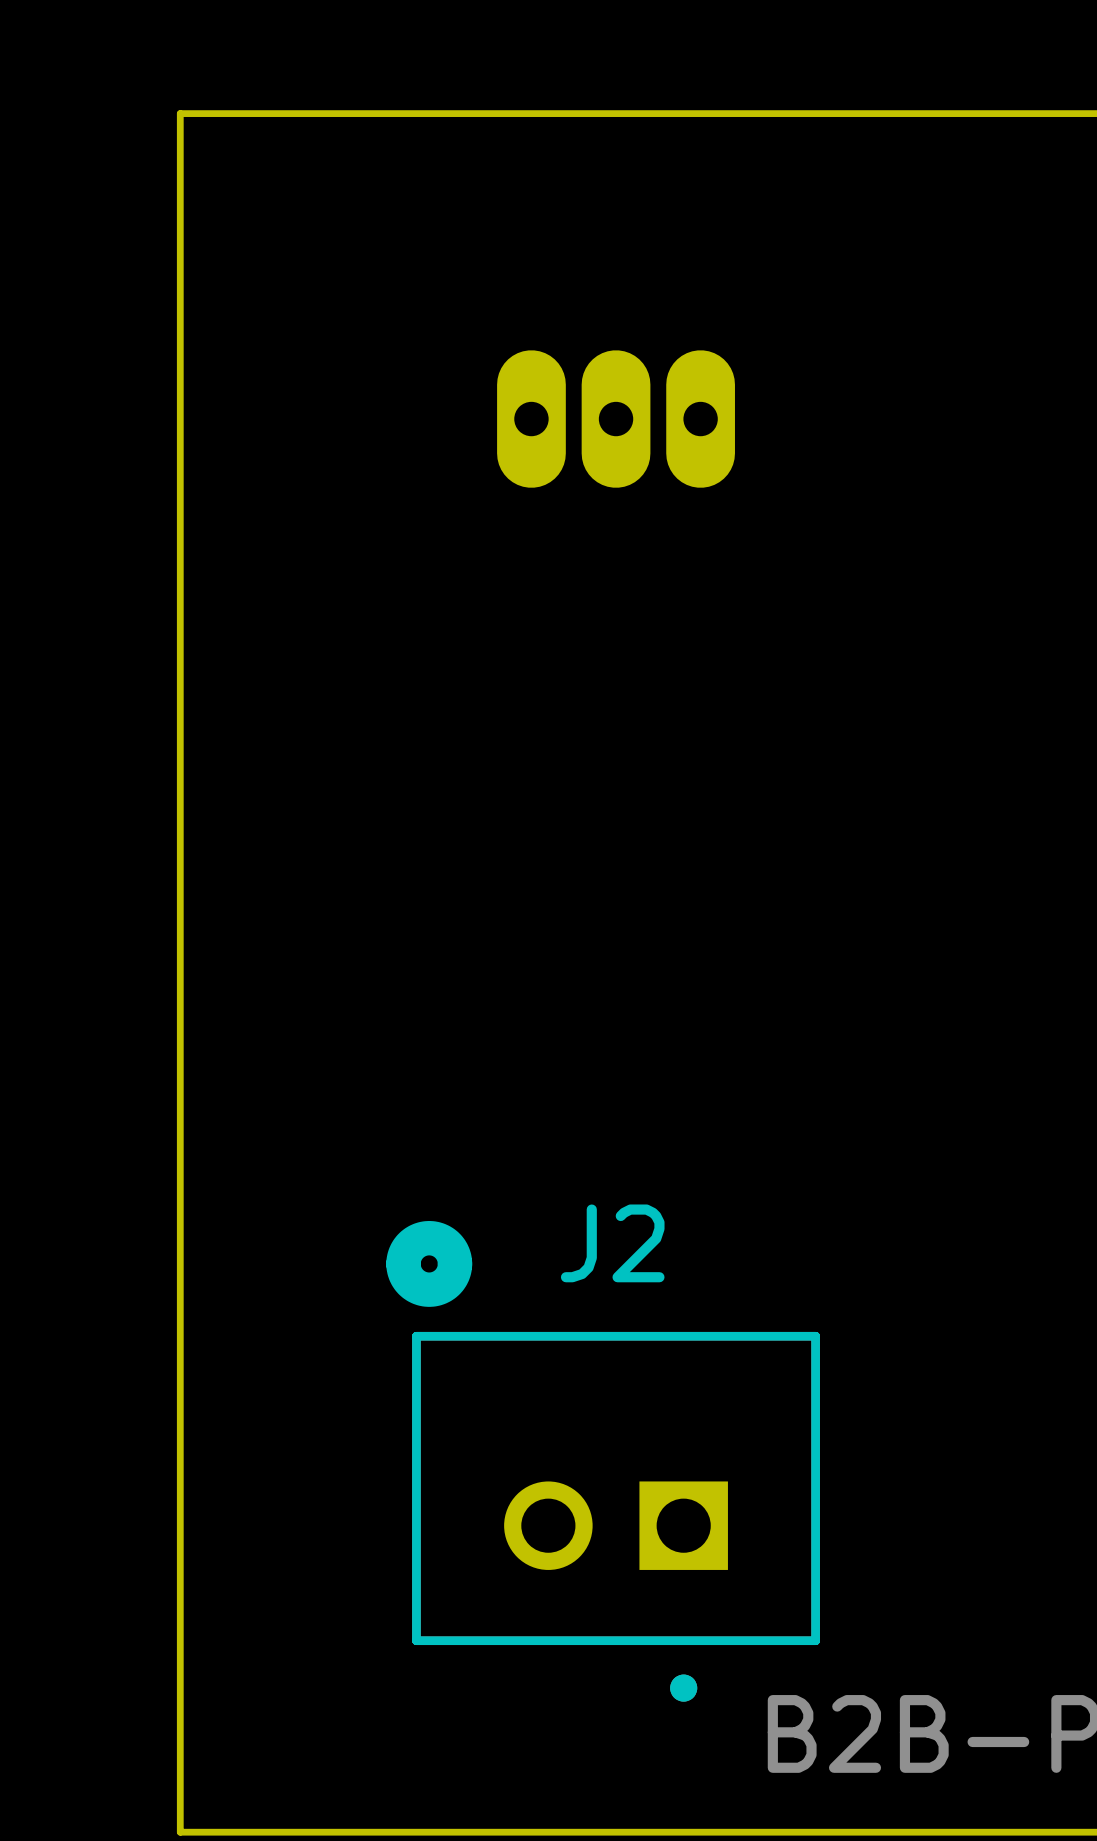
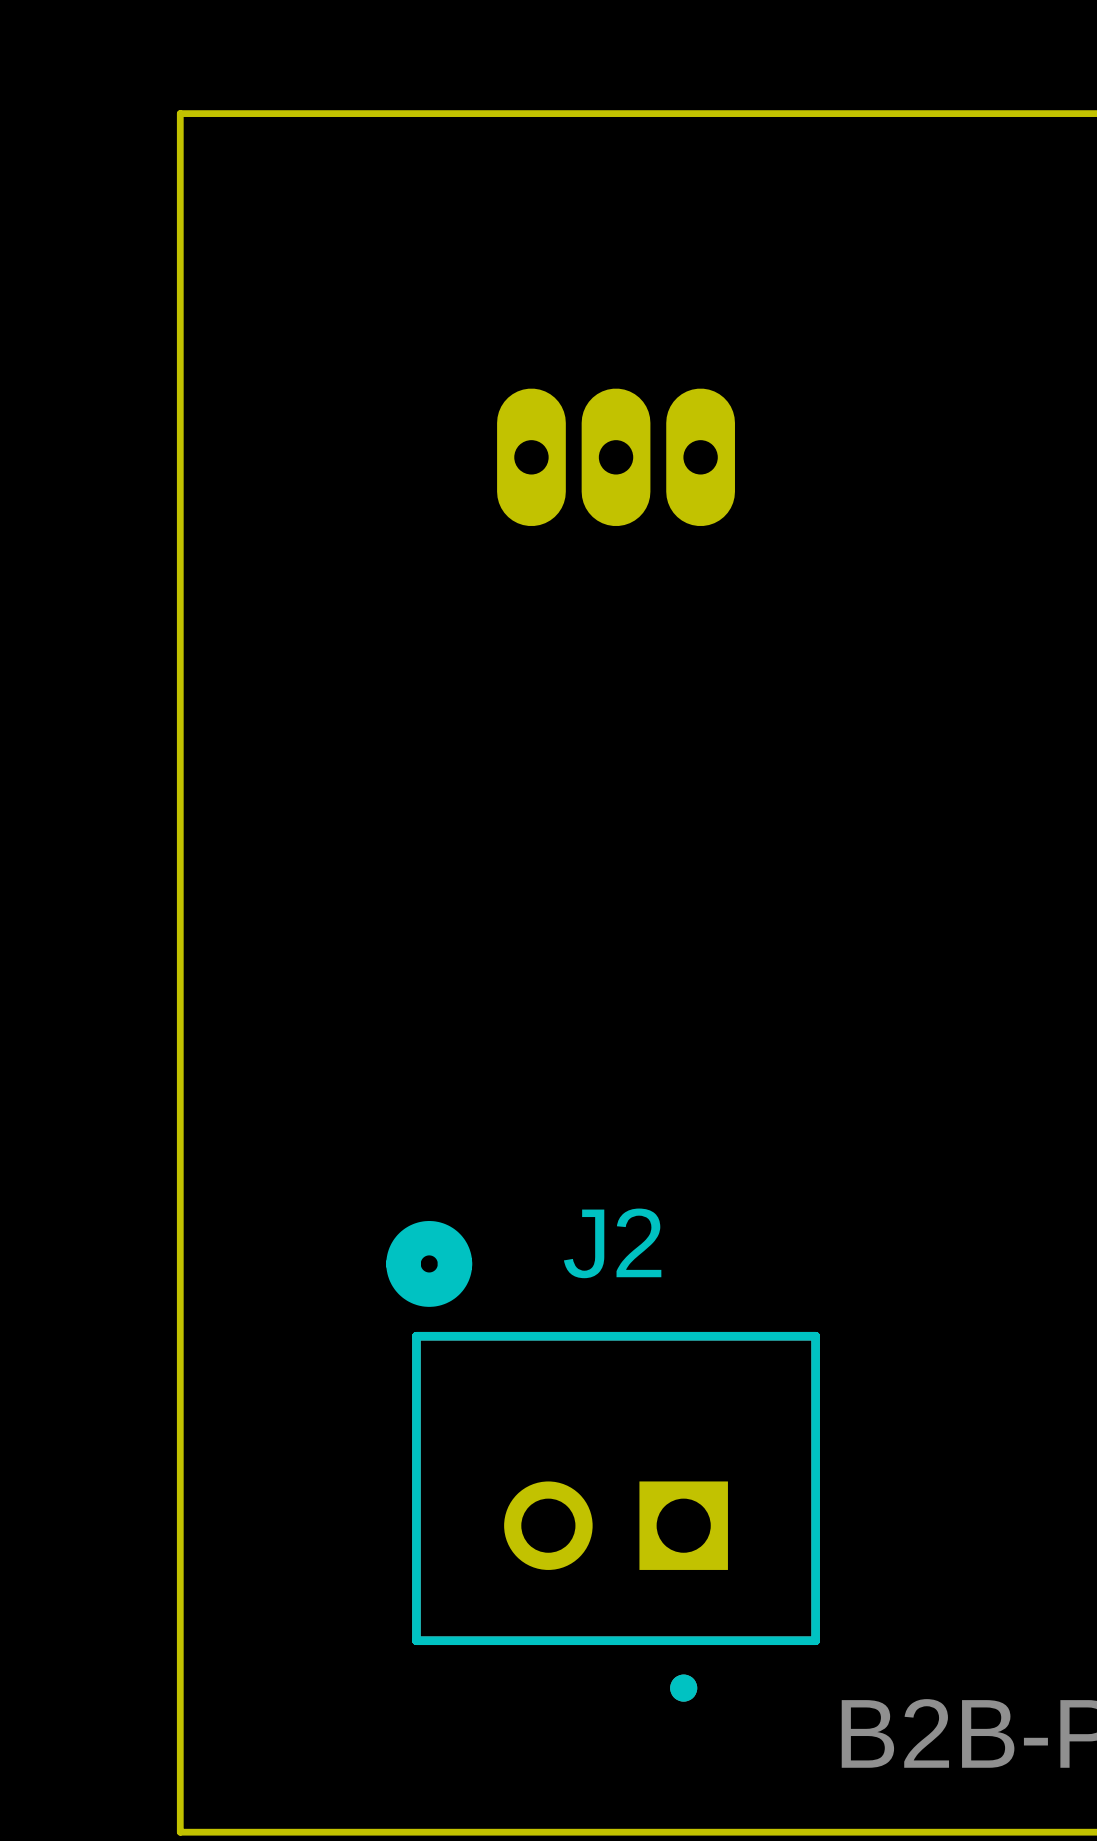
part position: (616, 419) -> (616, 457)

